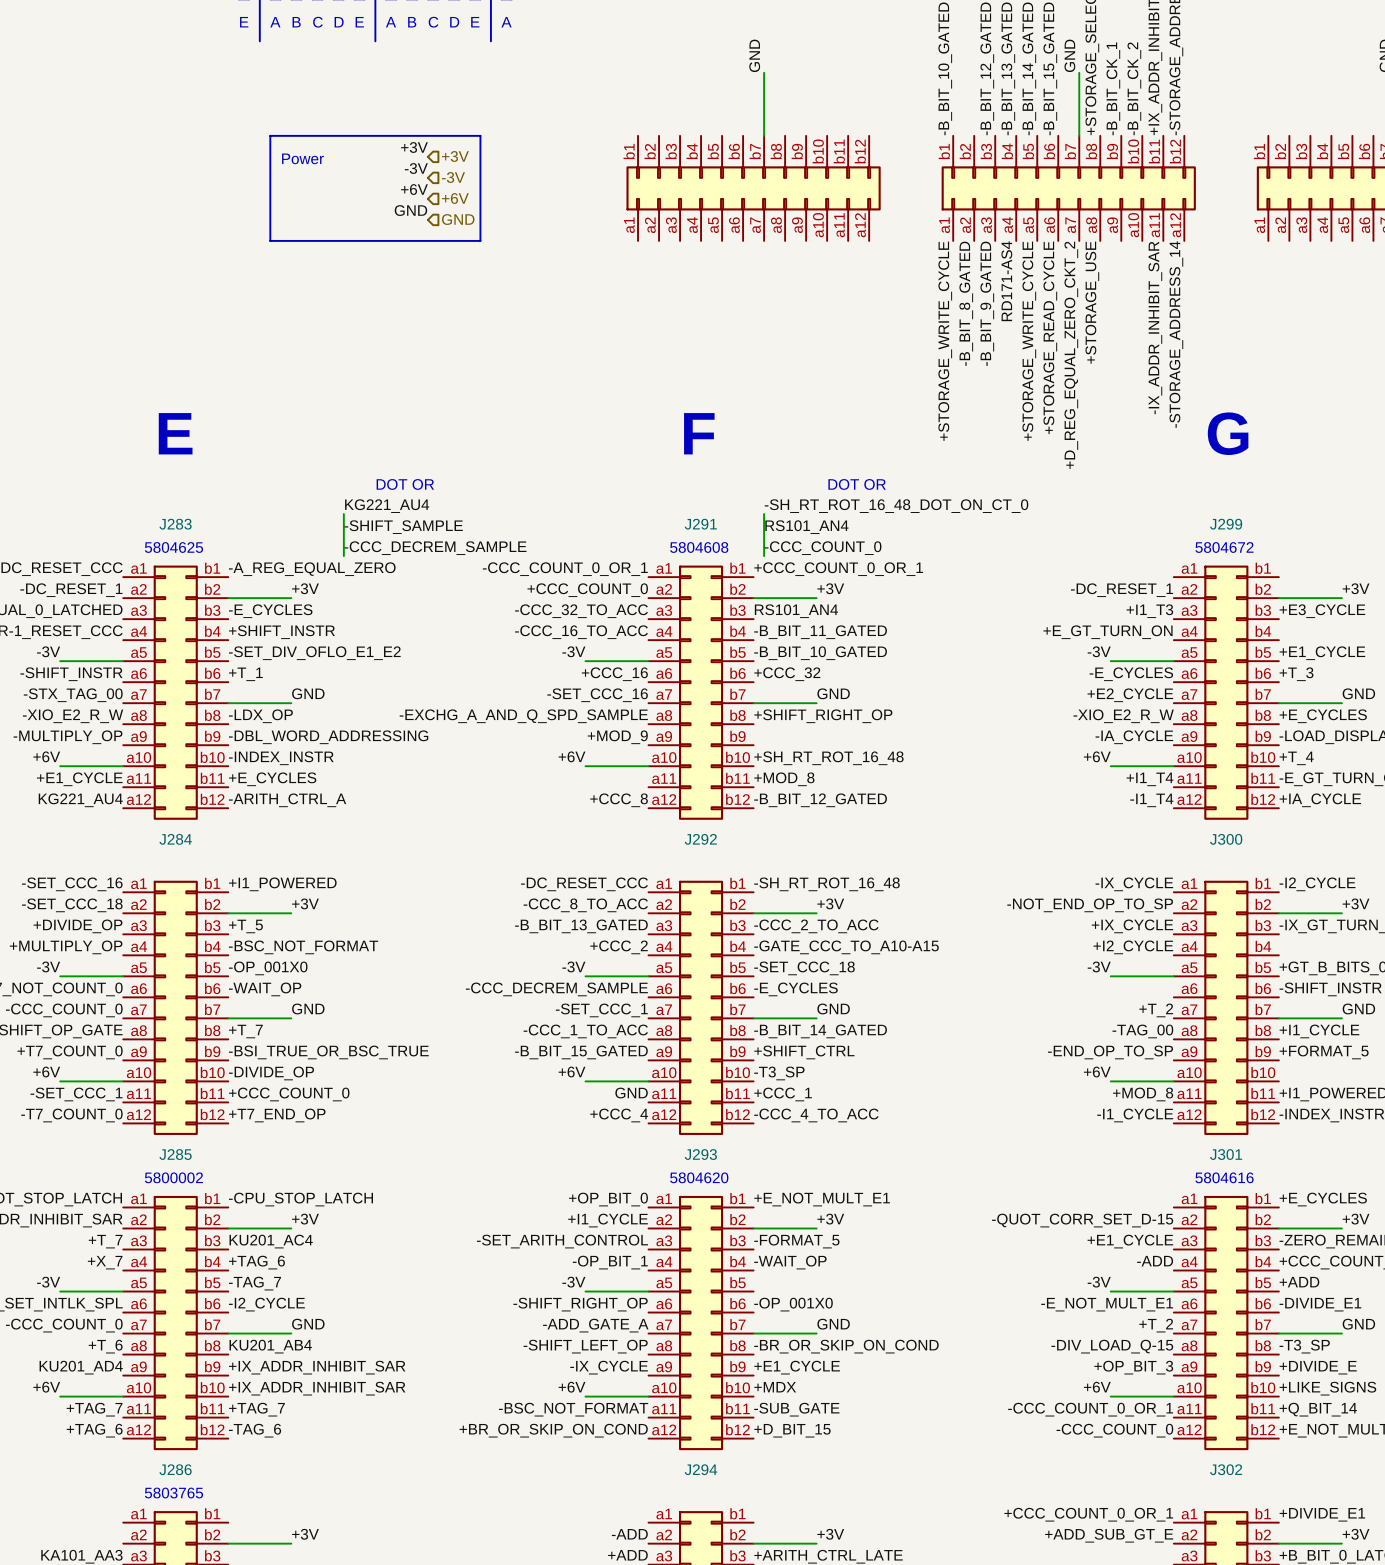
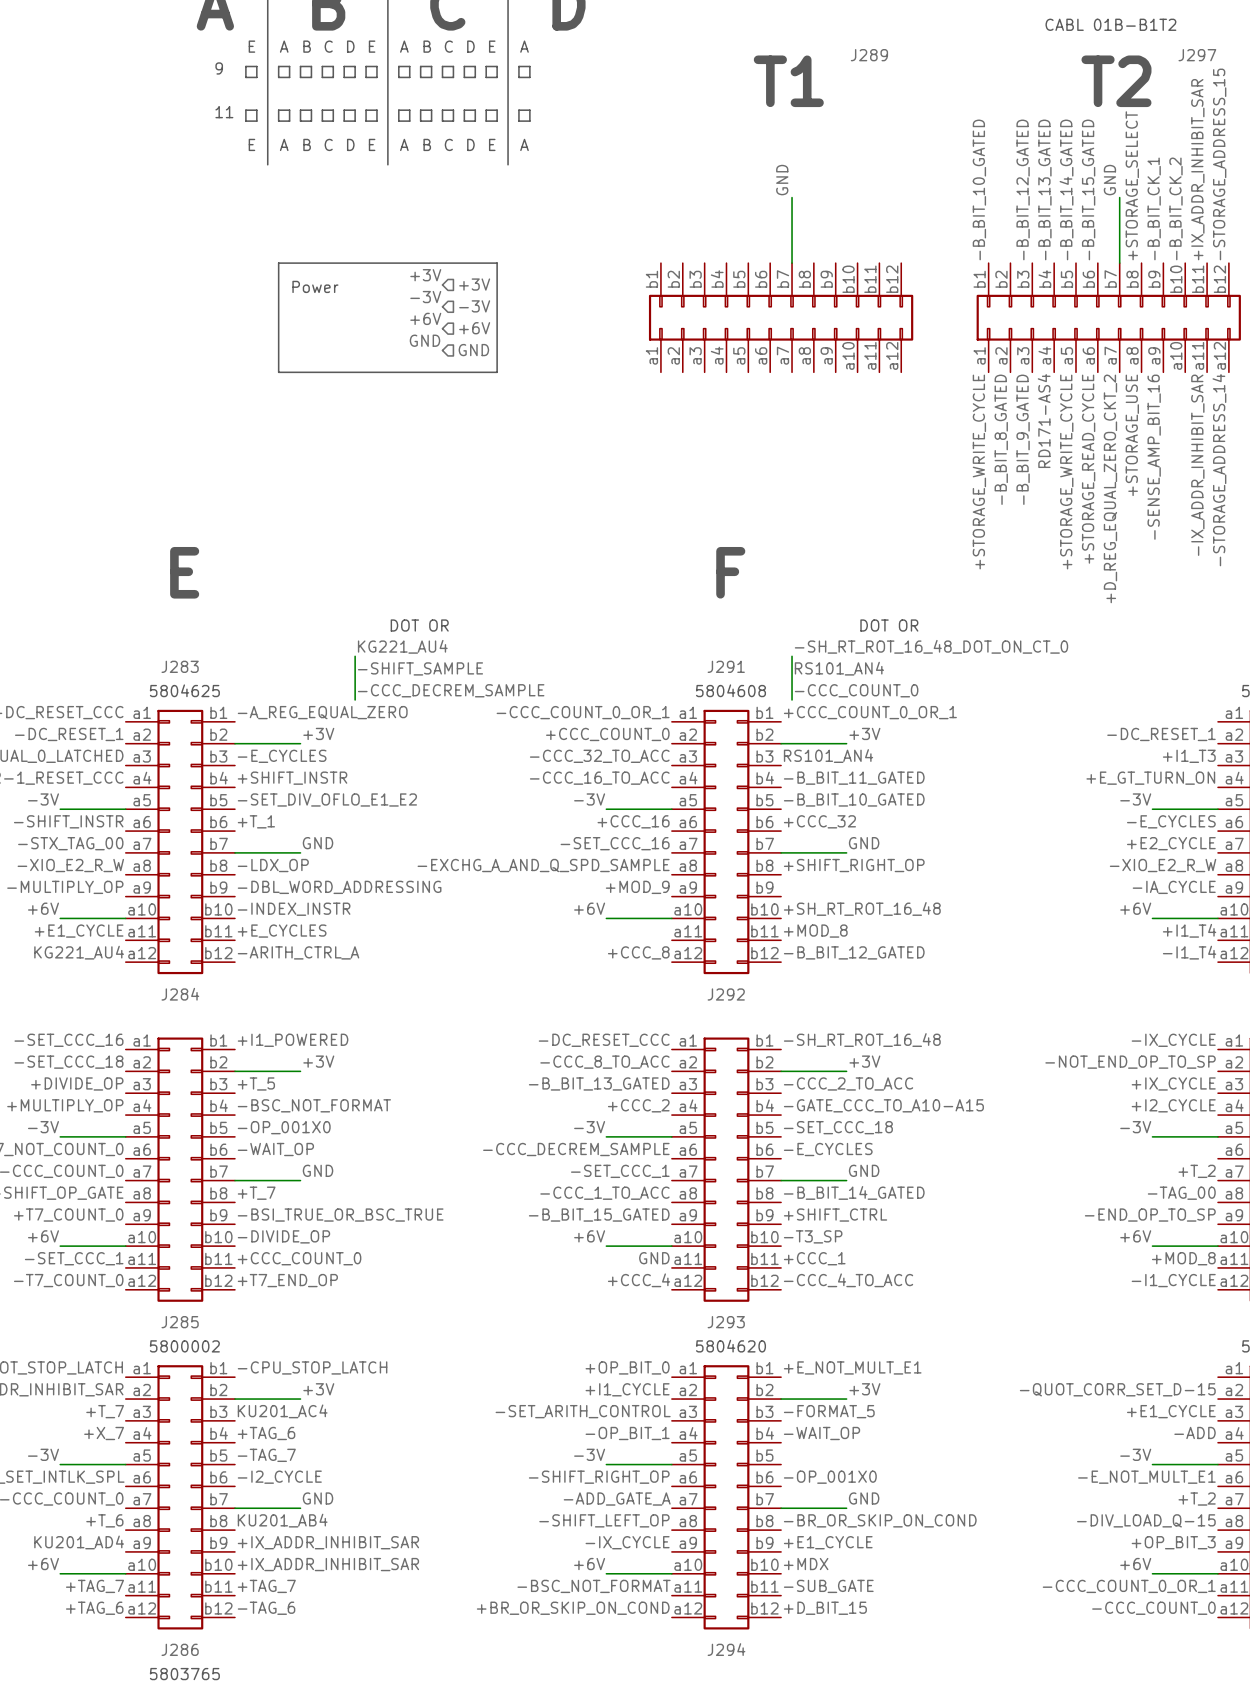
label: none -> -SENSE_AMP_BIT_16 (1154, 457)

